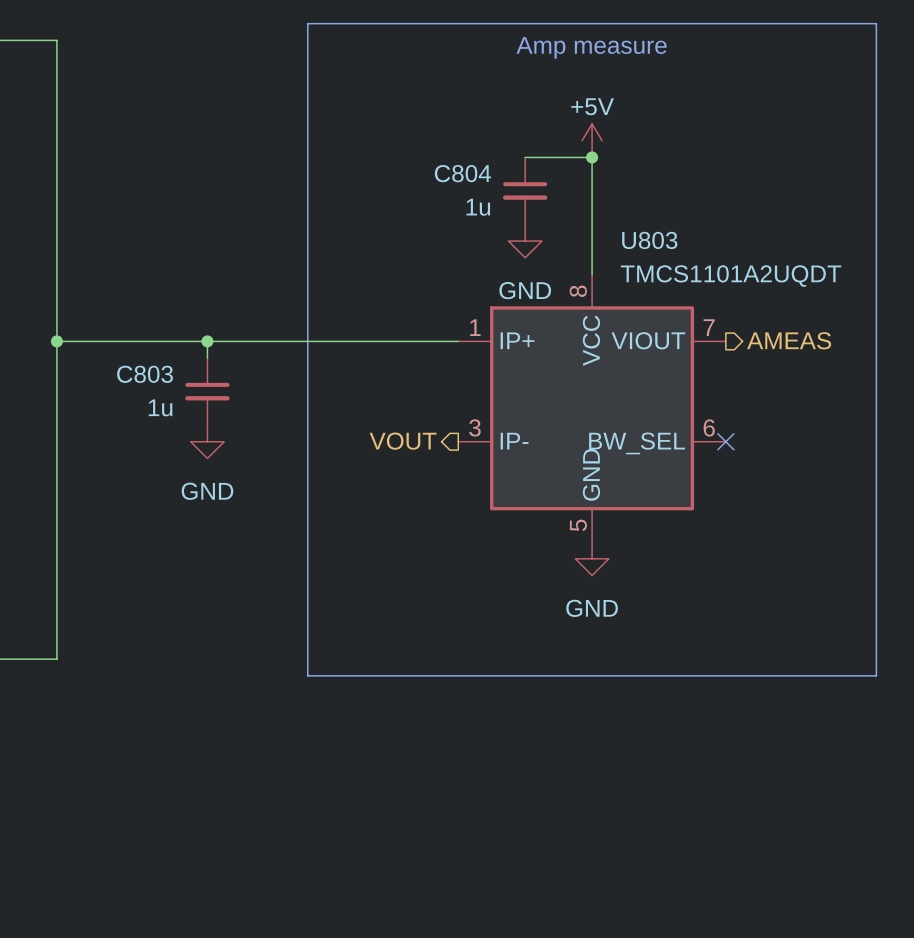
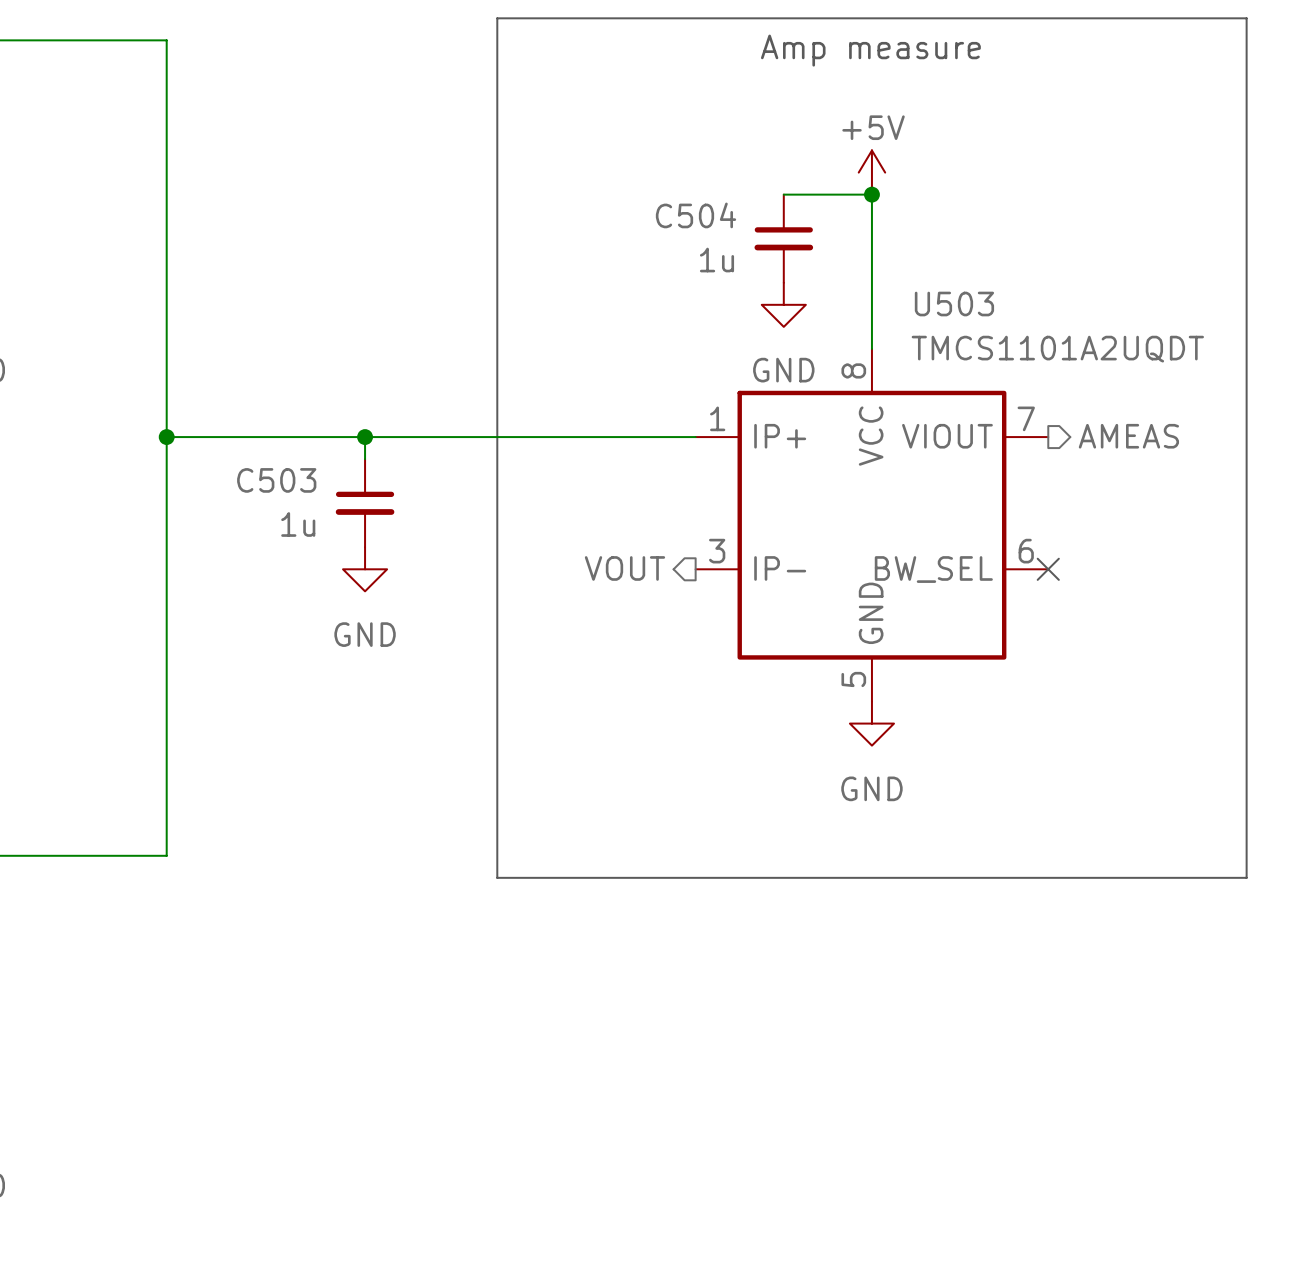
C804 name: C804 (462, 173) -> C504 (696, 215)
U803 name: U803 (649, 240) -> U503 (954, 304)
C803 name: C803 (145, 374) -> C503 (276, 480)

